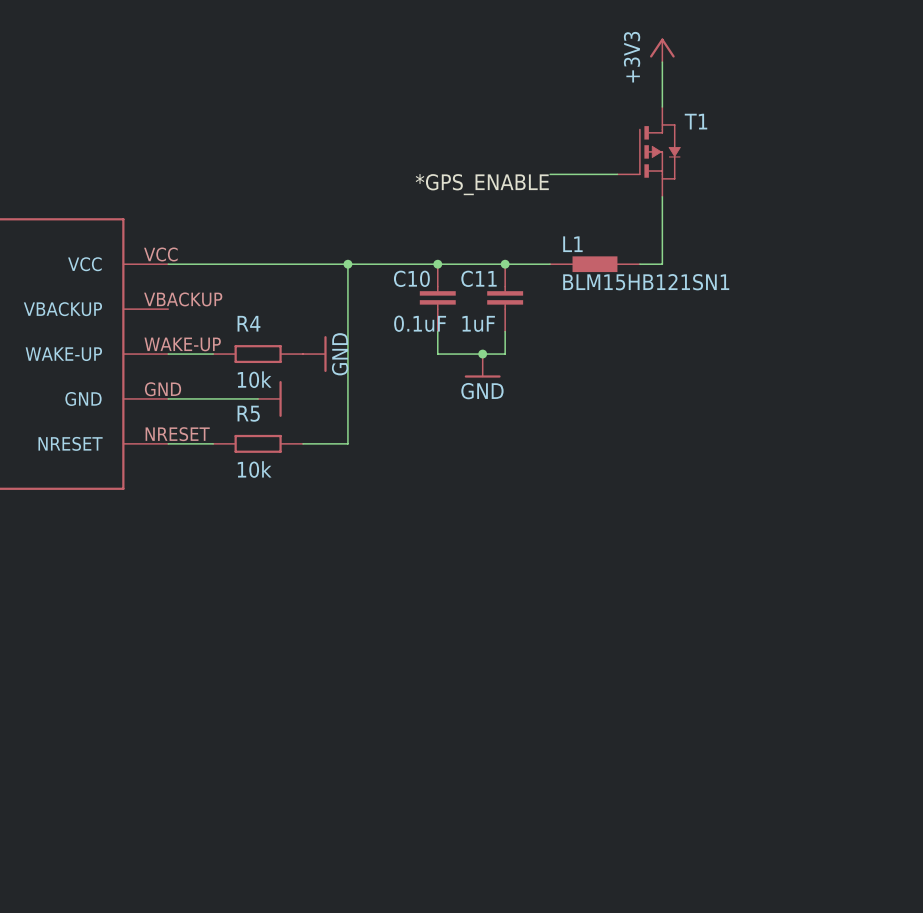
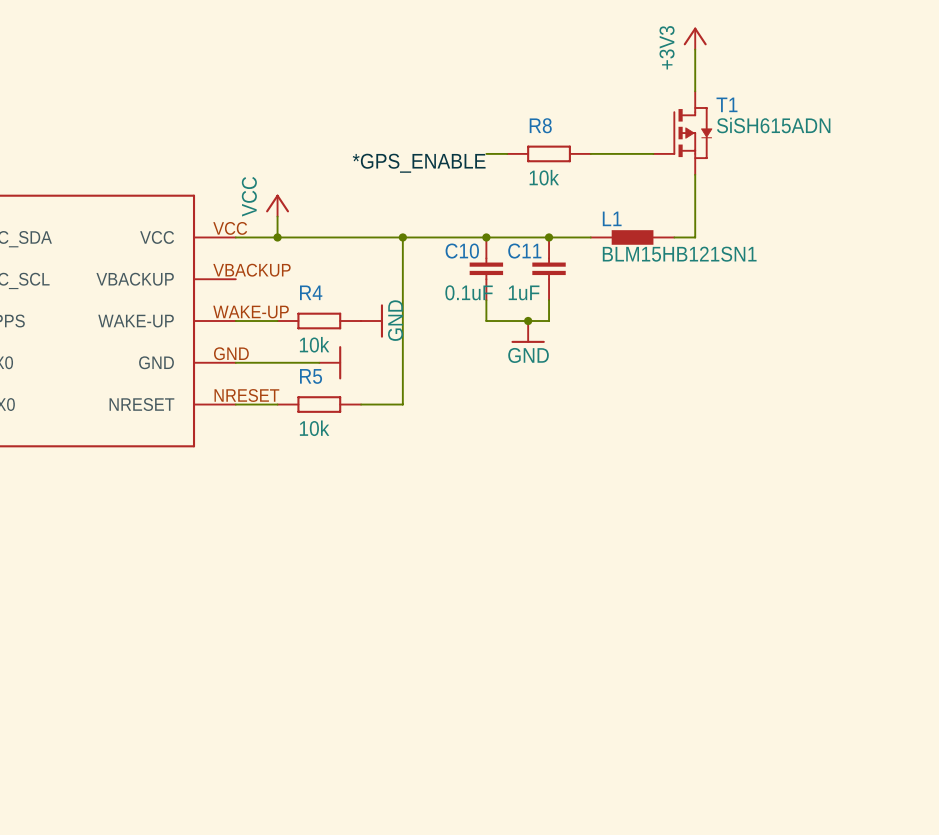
T1 value: none -> SiSH615ADN (773, 125)
wire: none -> (486, 153) (507, 153)
R8: none -> 10k (549, 153)
label position: *GPS_ENABLE (482, 184) -> *GPS_ENABLE (419, 163)
power symbol: none -> VCC (277, 205)
wire: none -> (277, 216) (277, 237)
junction: none -> (277, 237)

